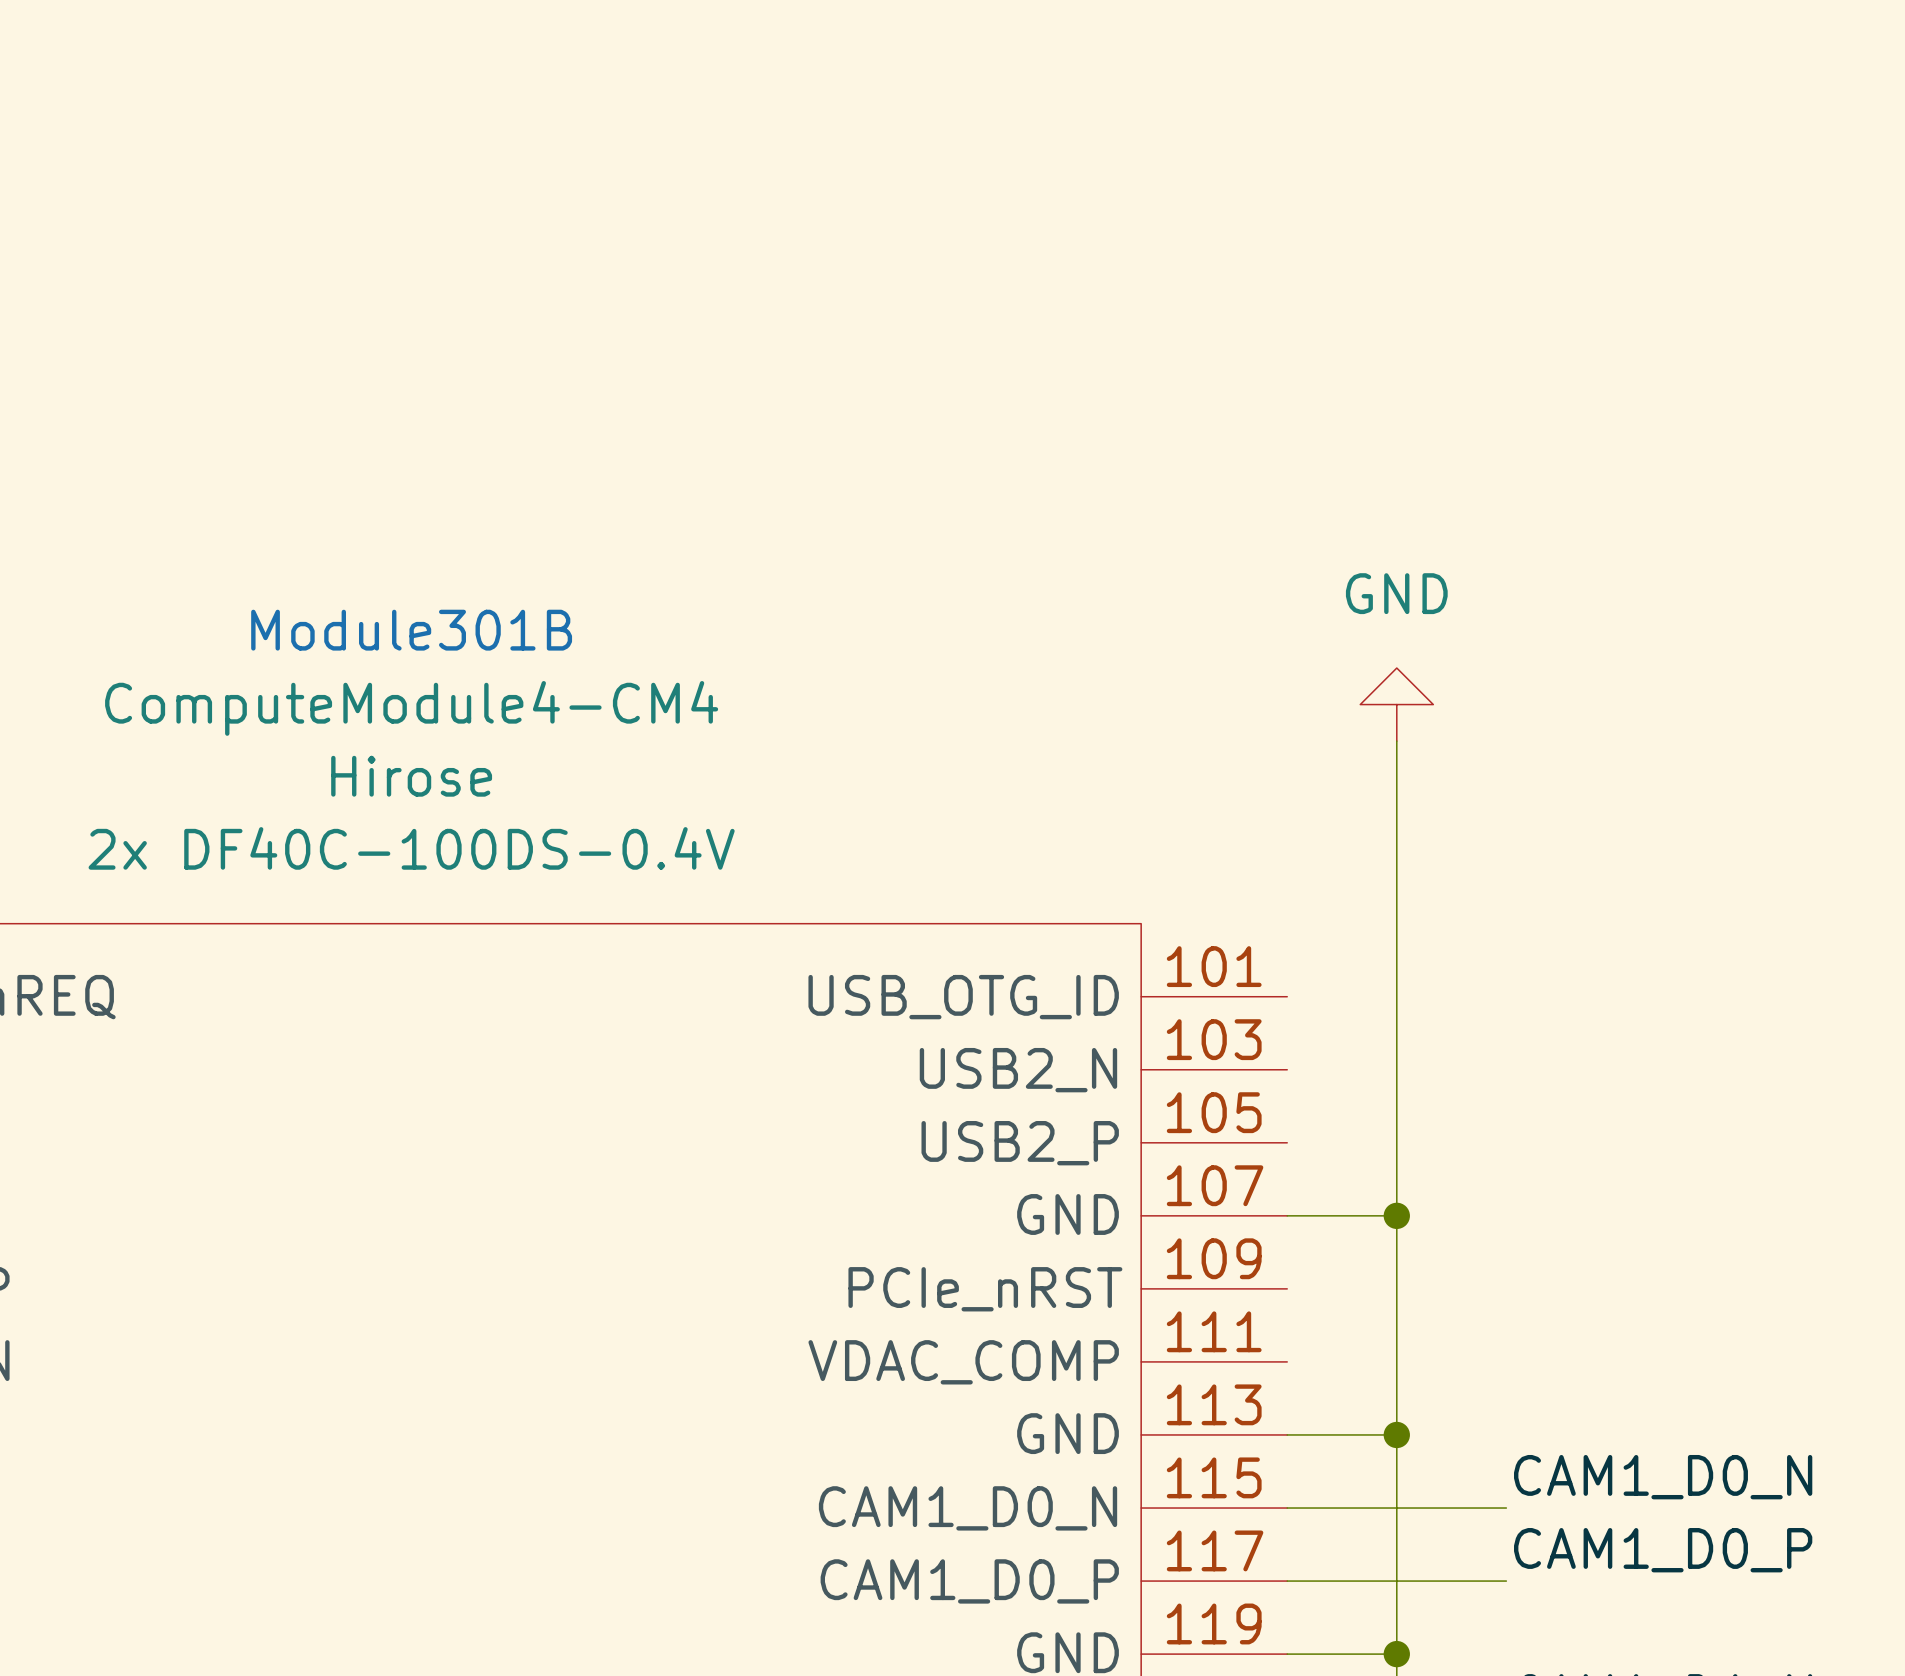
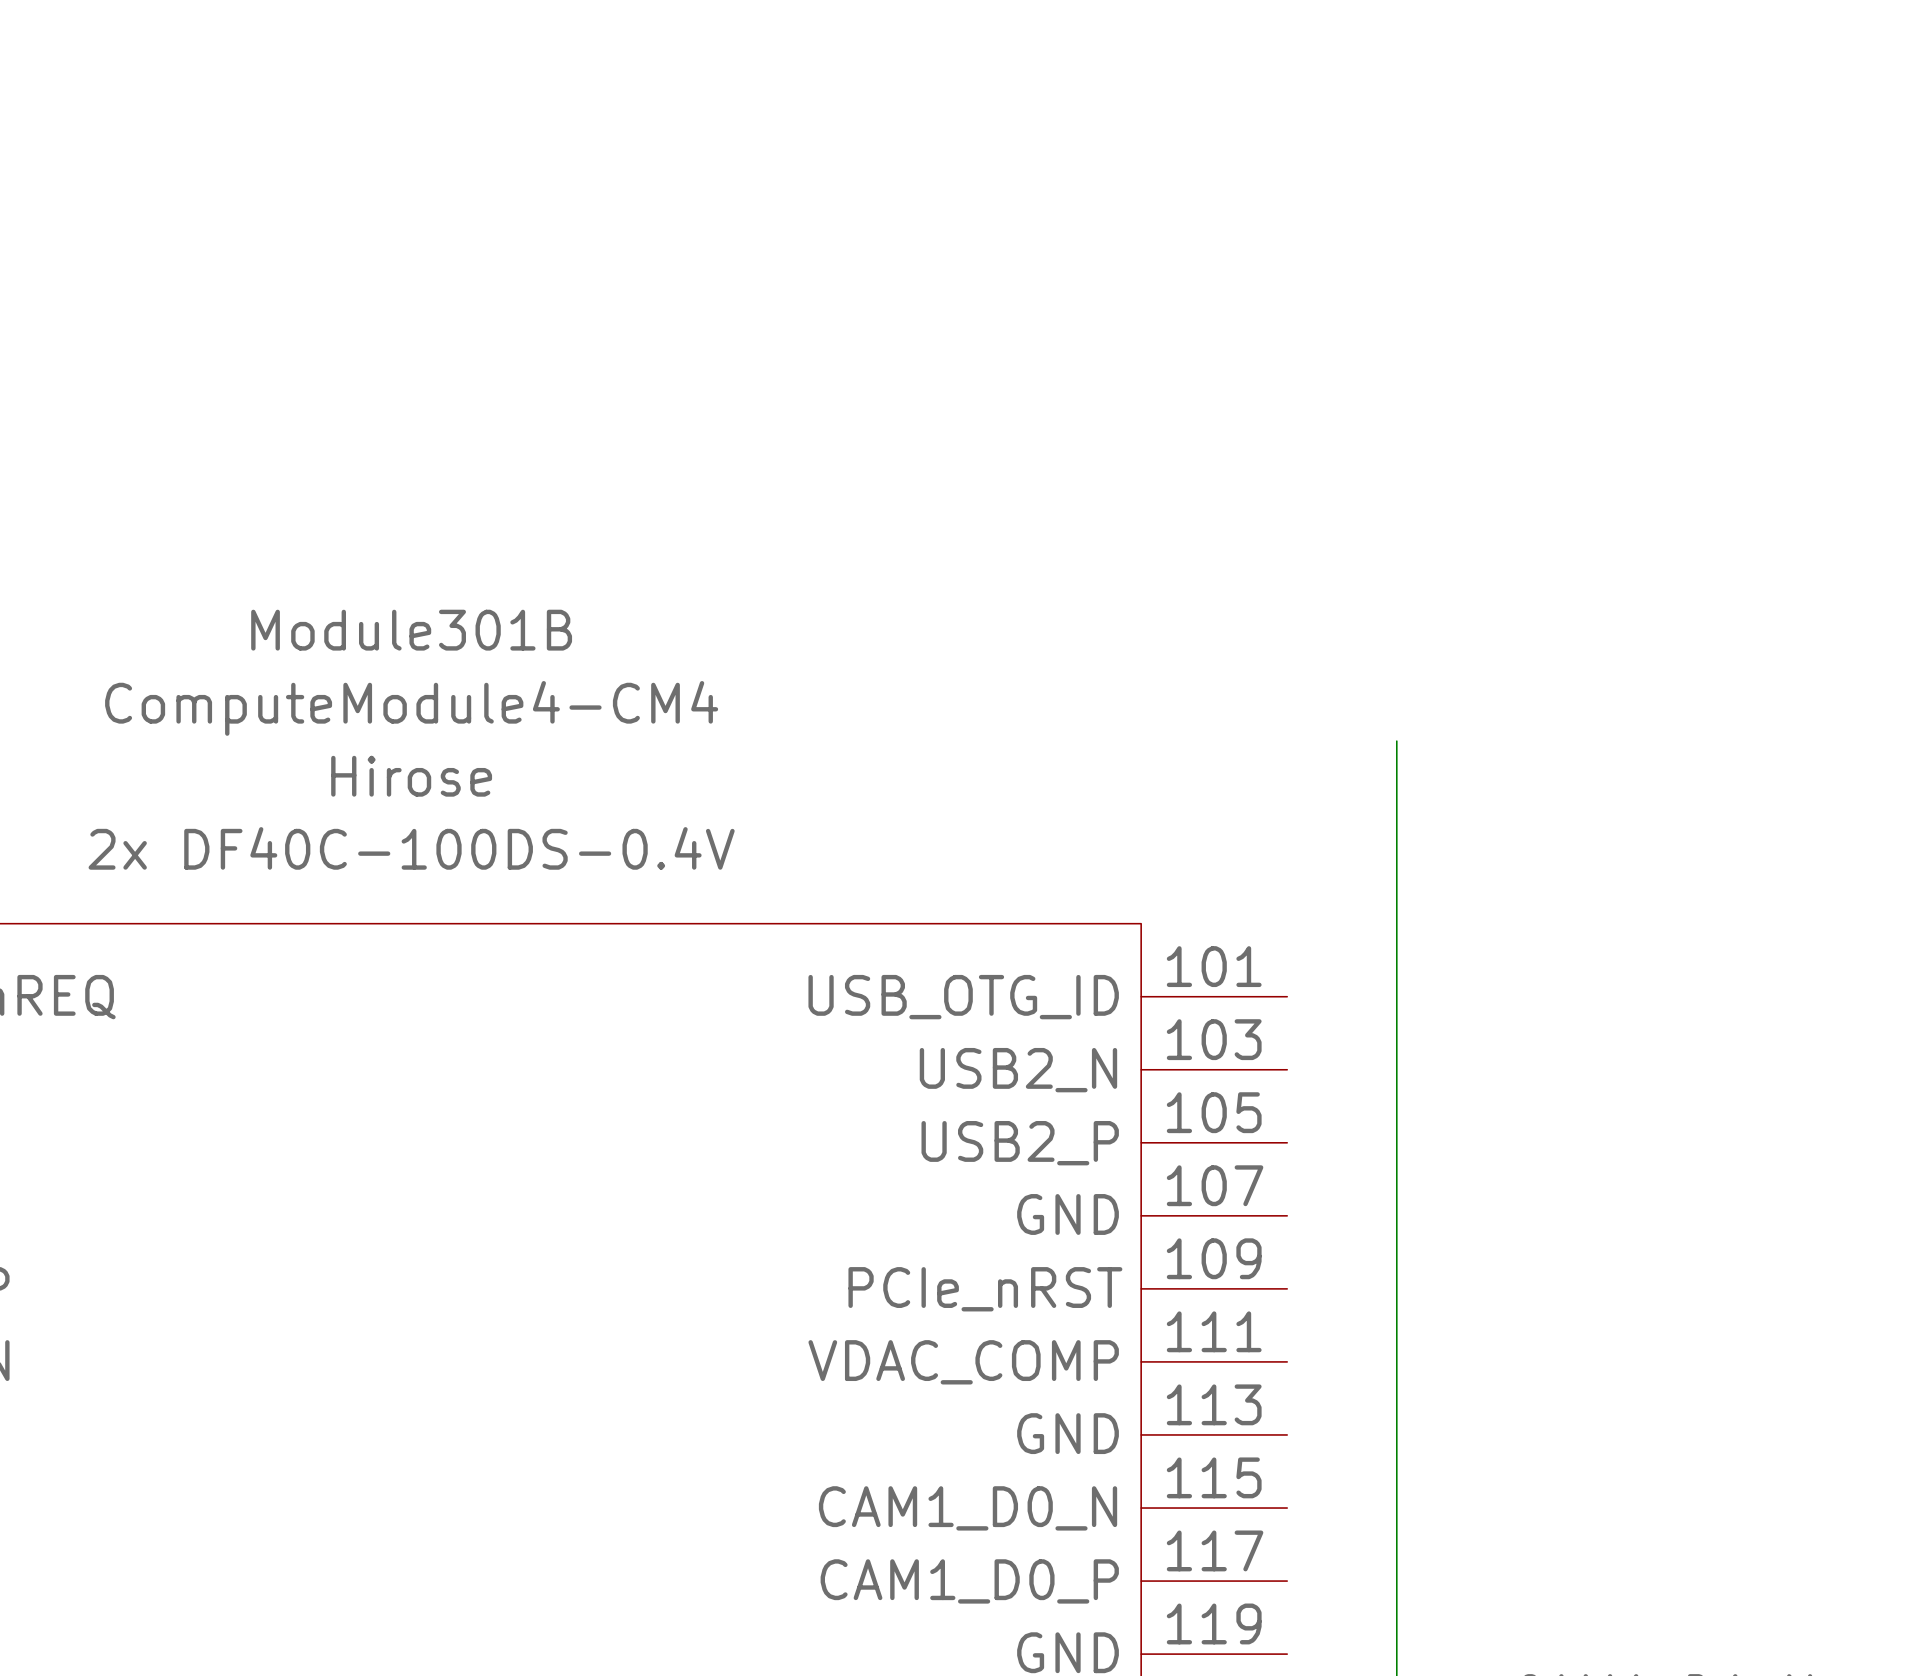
power symbol: GND (1396, 704) -> none
wire: (1287, 1215) (1396, 1215) -> none
junction: (1396, 1215) -> none
wire: (1287, 1434) (1396, 1434) -> none
junction: (1396, 1434) -> none
label: CAM1_D0_N (1663, 1477) -> none
wire: (1287, 1508) (1506, 1508) -> none
label: CAM1_D0_P (1663, 1550) -> none
wire: (1287, 1581) (1506, 1581) -> none
wire: (1287, 1654) (1396, 1654) -> none
junction: (1396, 1654) -> none

